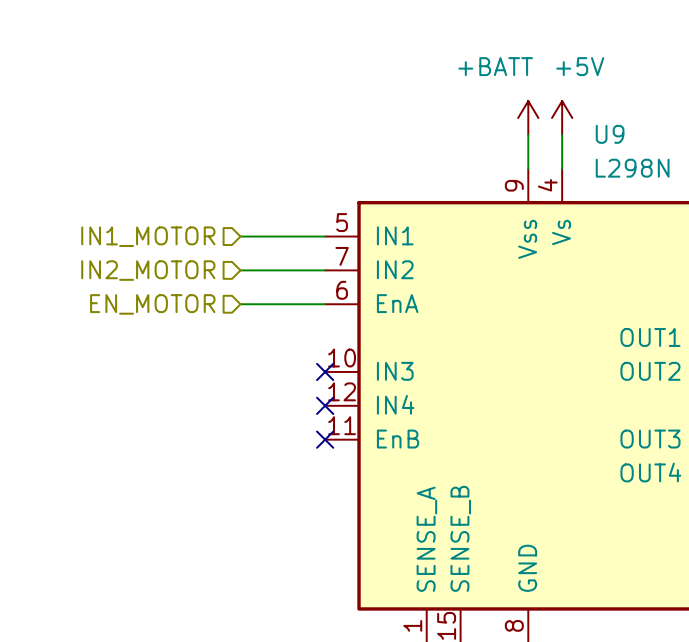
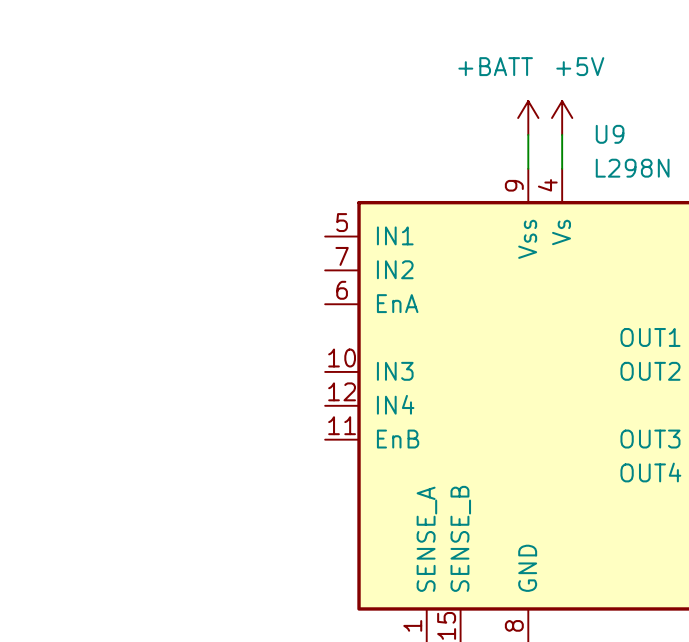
hierarchical label: IN1_MOTOR (148, 236) -> none
wire: (240, 236) (325, 236) -> none
hierarchical label: IN2_MOTOR (148, 270) -> none
wire: (240, 270) (325, 270) -> none
hierarchical label: EN_MOTOR (152, 304) -> none
wire: (240, 304) (325, 304) -> none
no-connect mark: (325, 371) -> none
no-connect mark: (325, 405) -> none
no-connect mark: (325, 439) -> none

